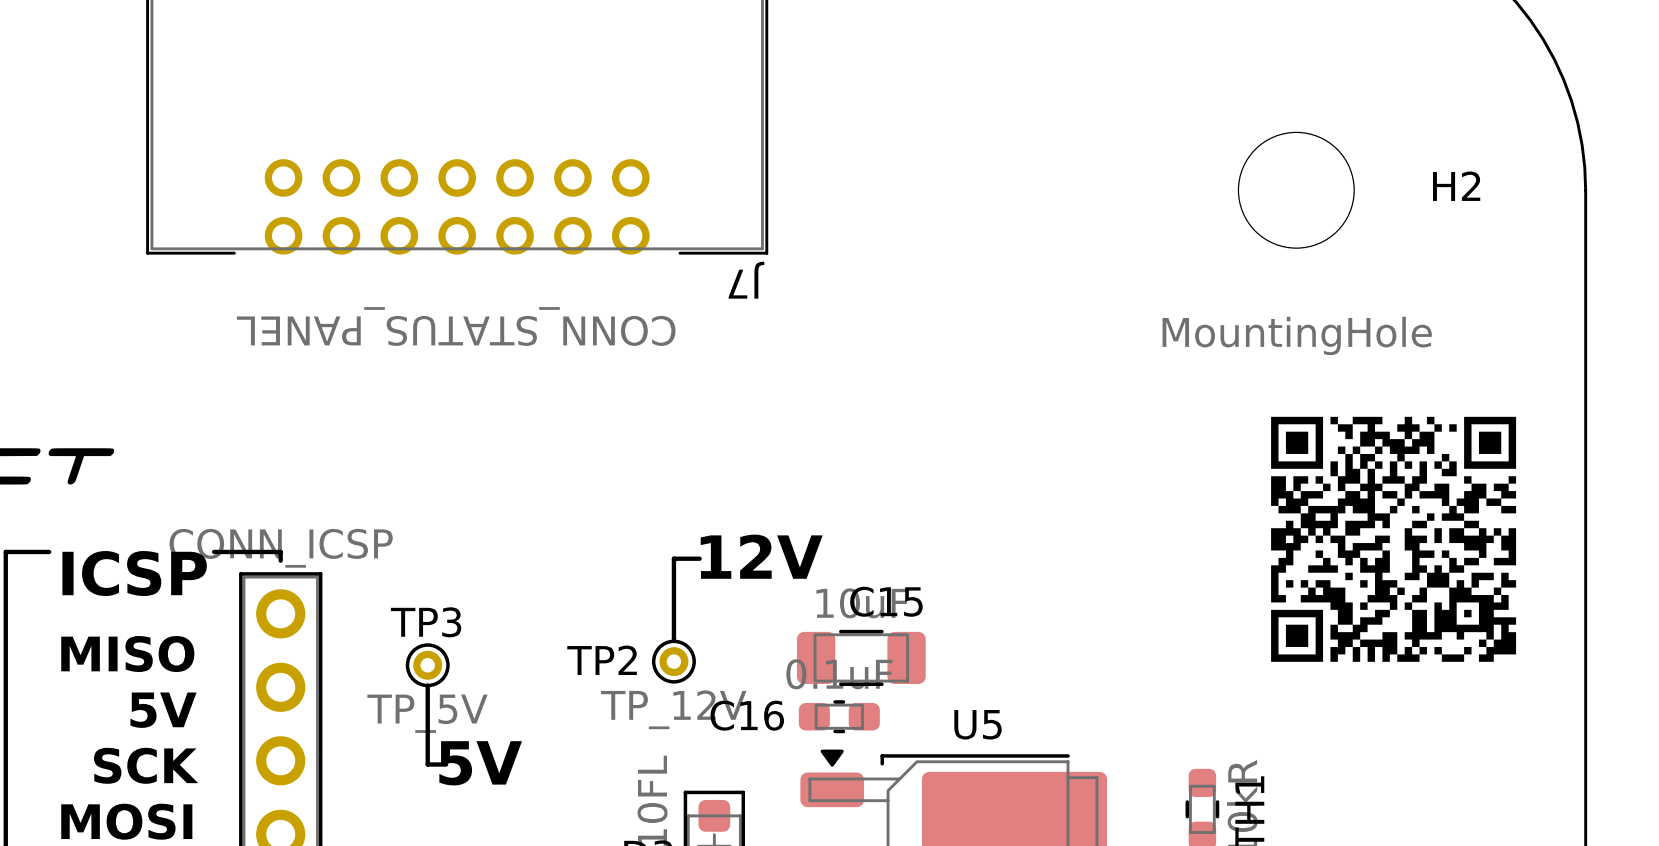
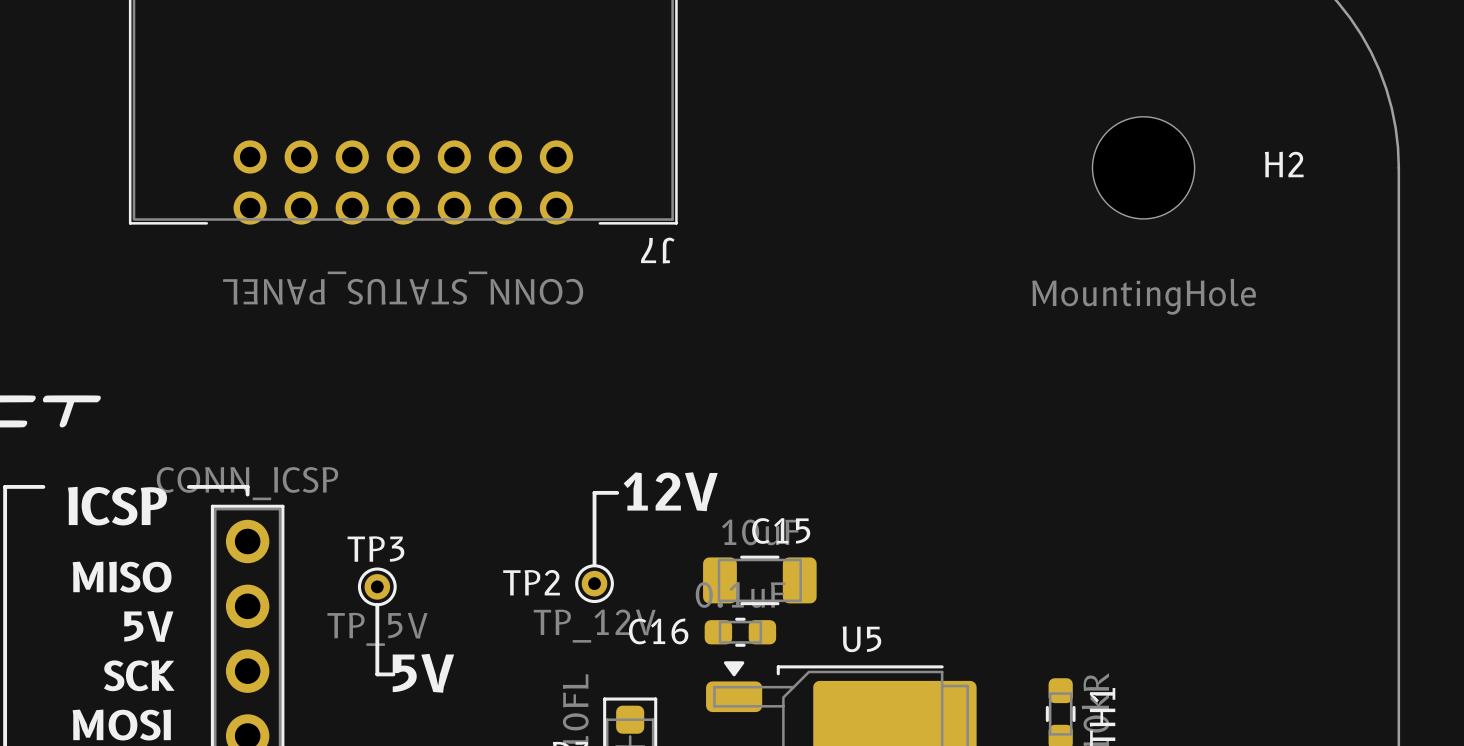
drawing: [1271, 416, 1517, 662] -> none

